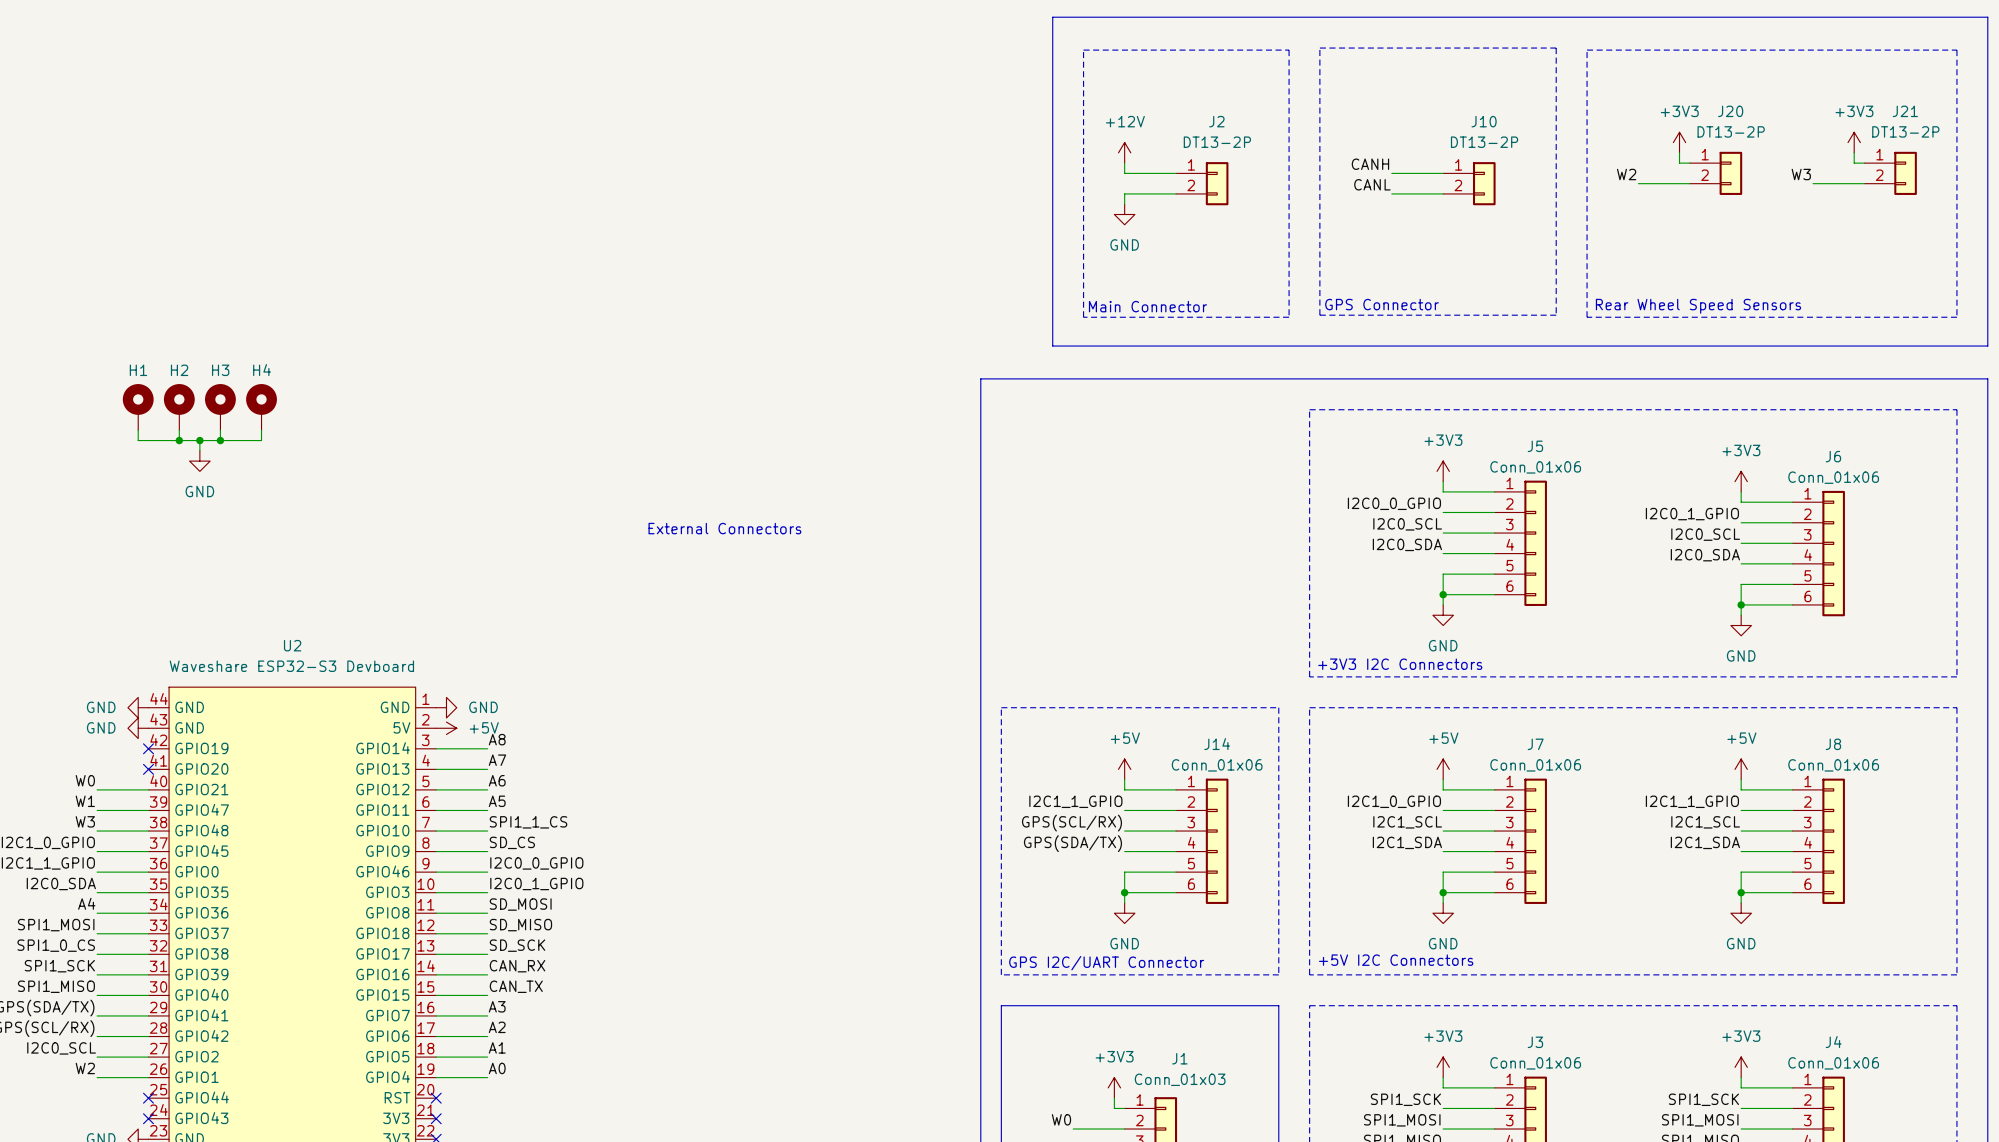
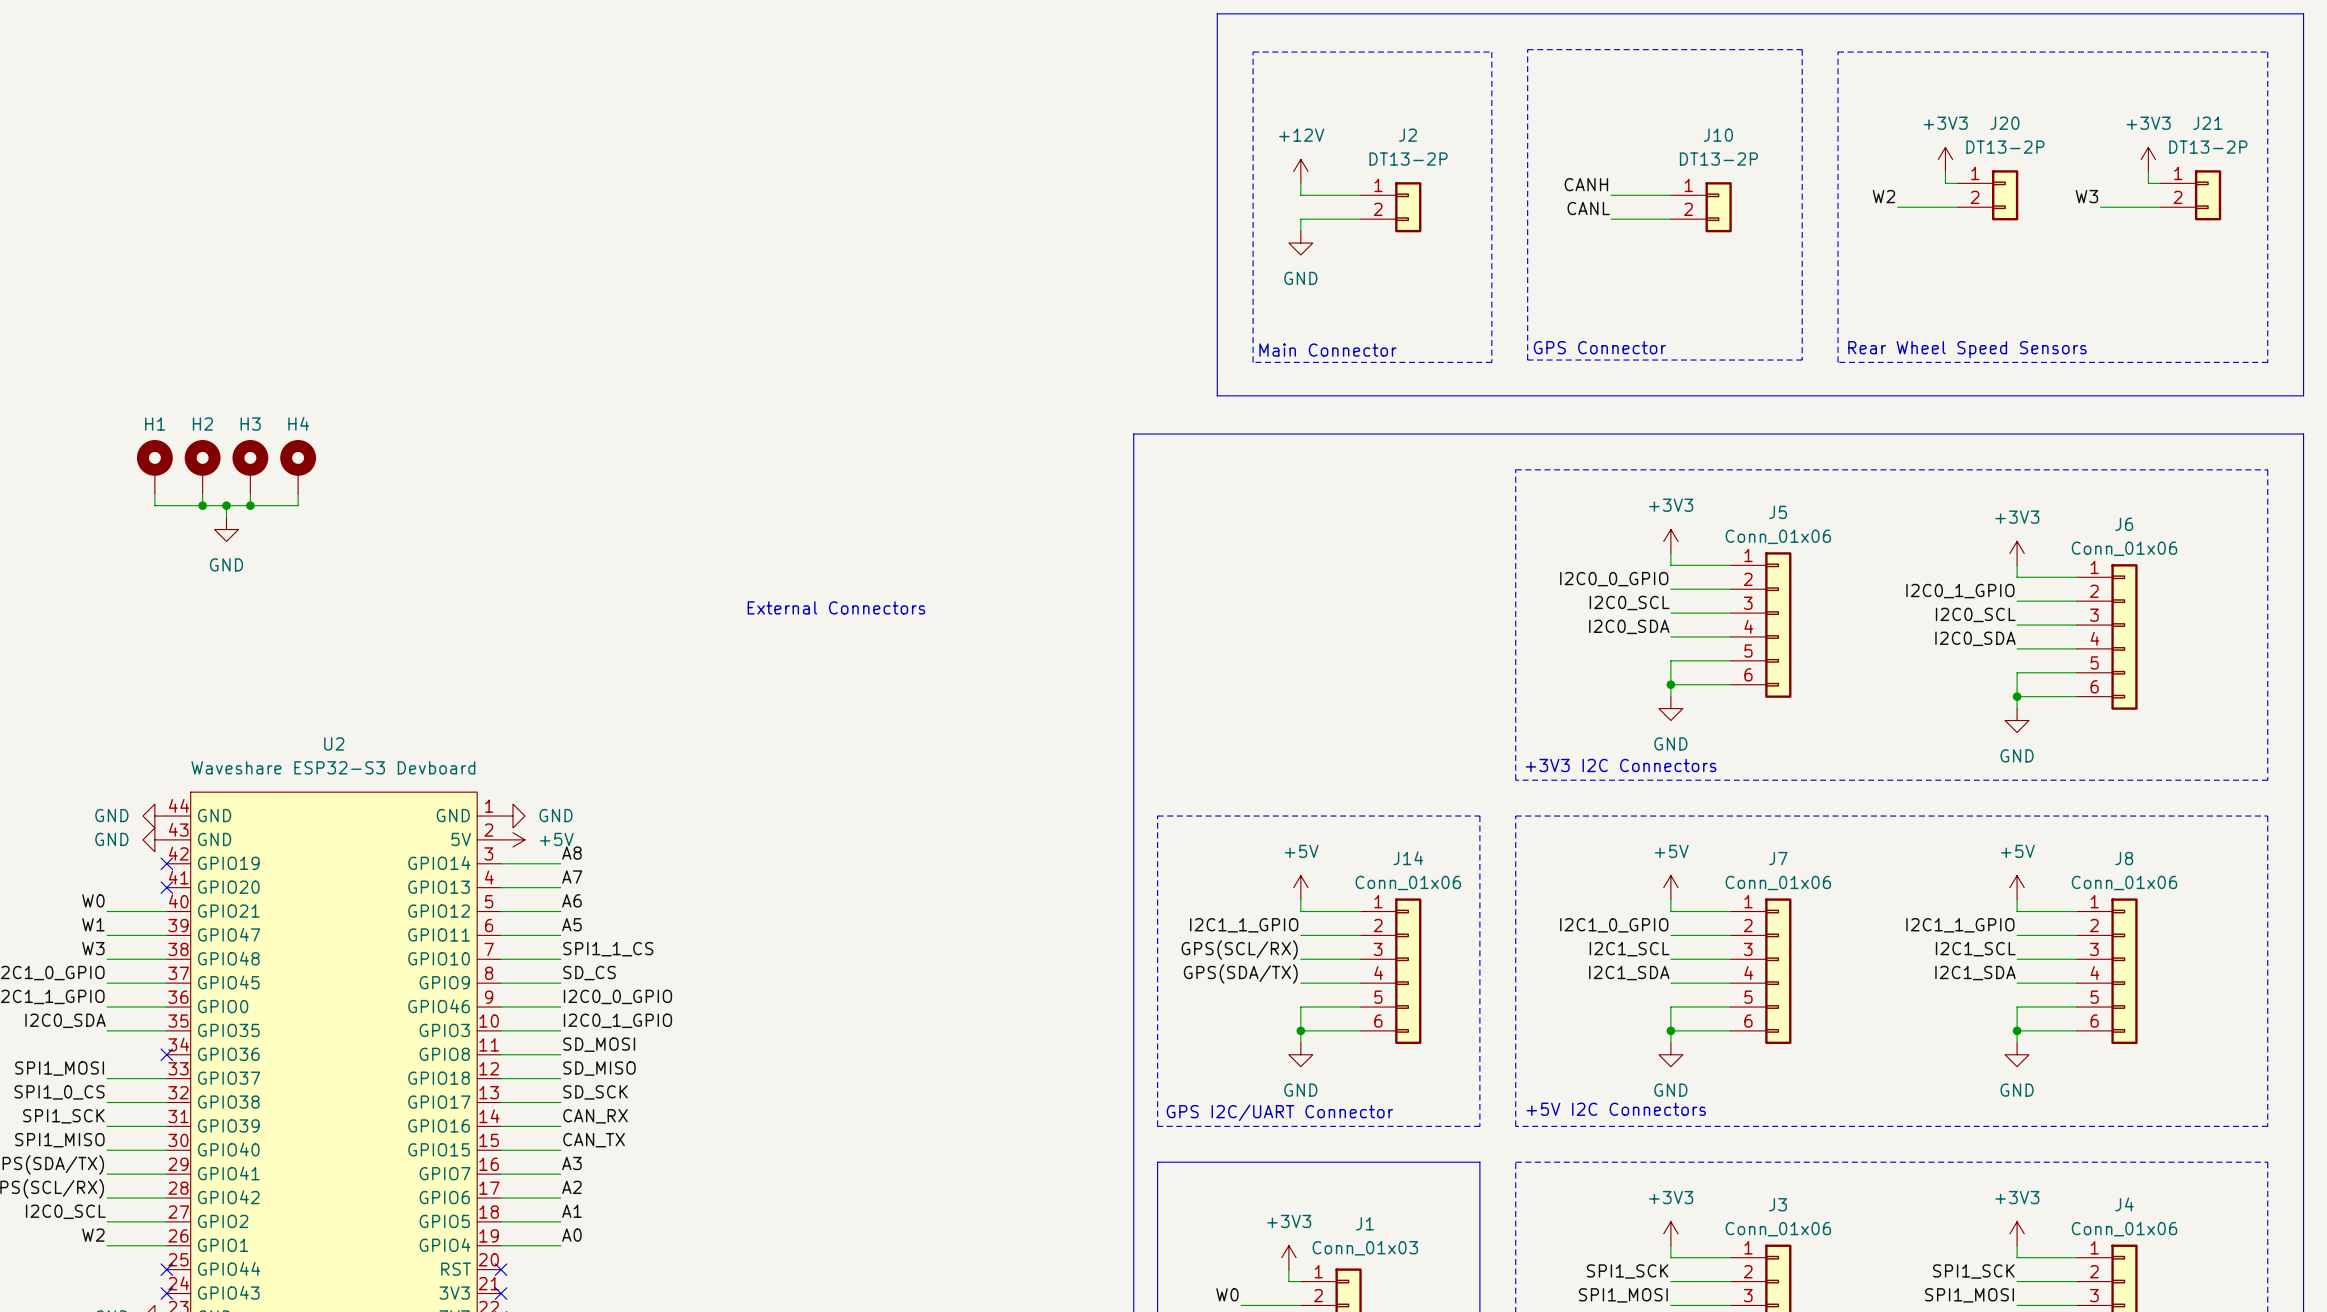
label: A4 (86, 903) -> none
wire: (97, 913) (148, 913) -> none
no-connect mark: none -> (166, 1054)

